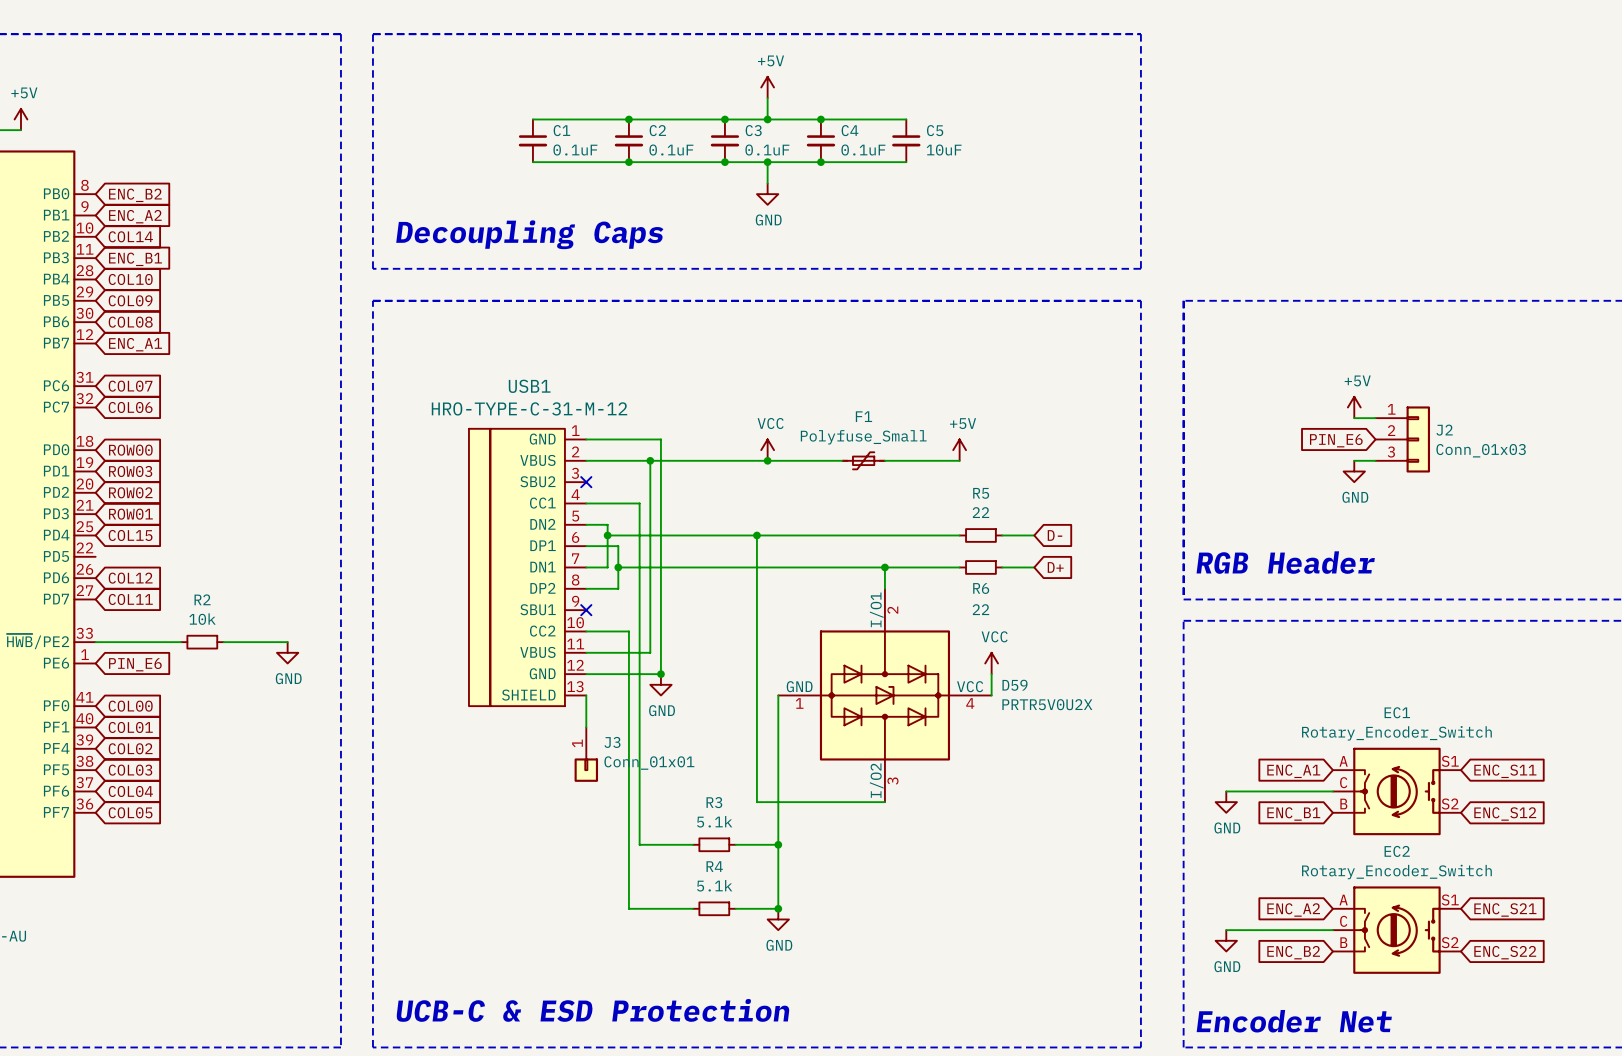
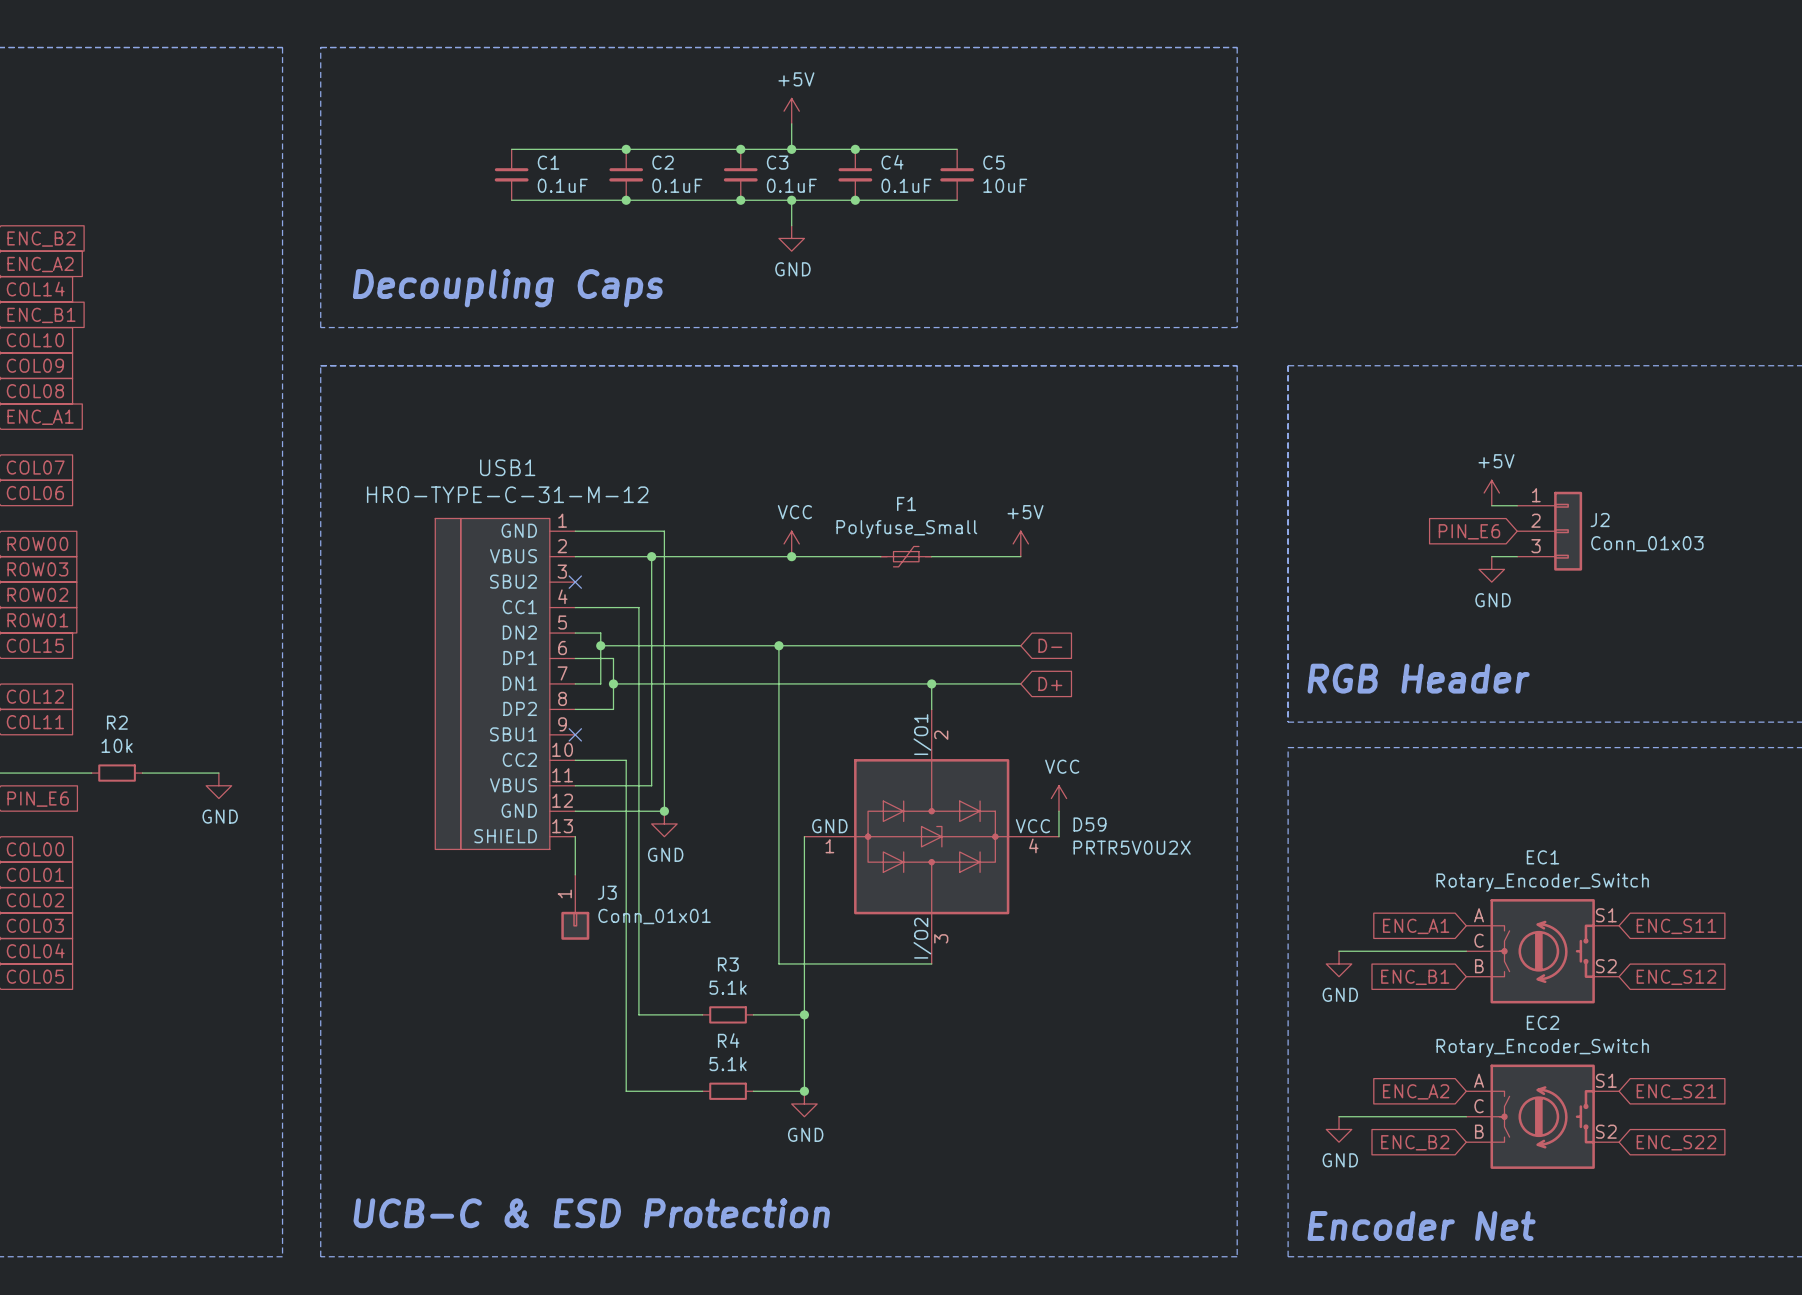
R5: 22 (980, 535) -> none
wire: (1002, 535) (1034, 535) -> none
global label position: D- (1055, 535) -> D- (1050, 645)
R6: 22 (980, 567) -> none
wire: (1002, 567) (1034, 567) -> none
global label position: D+ (1055, 567) -> D+ (1050, 683)

